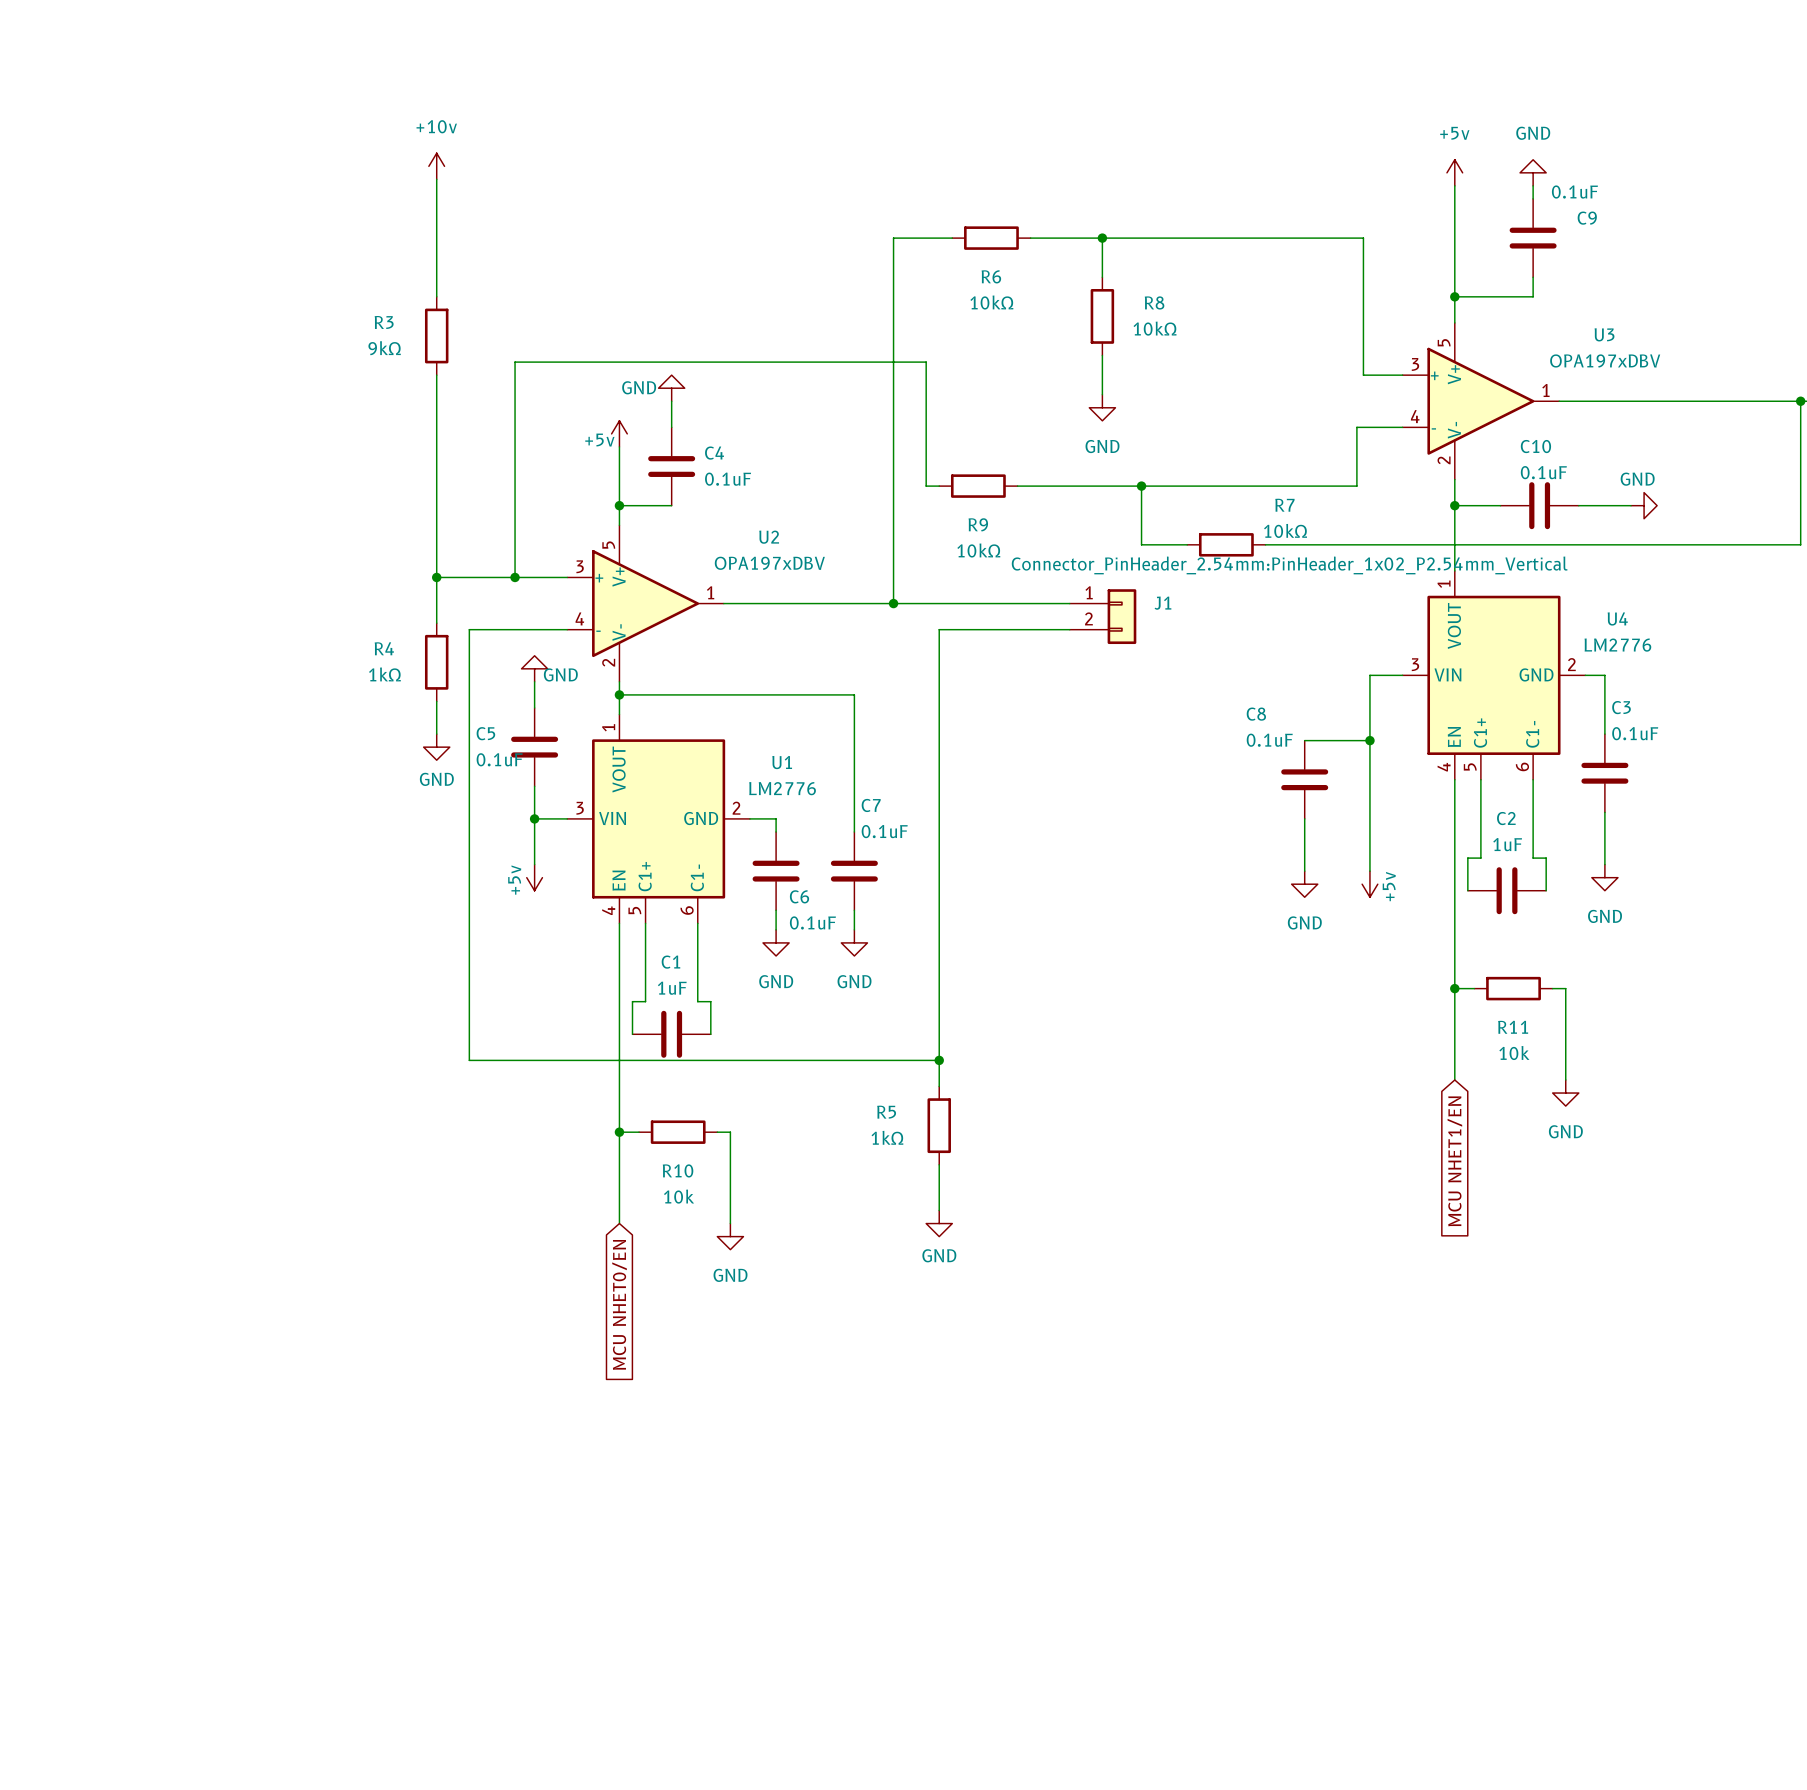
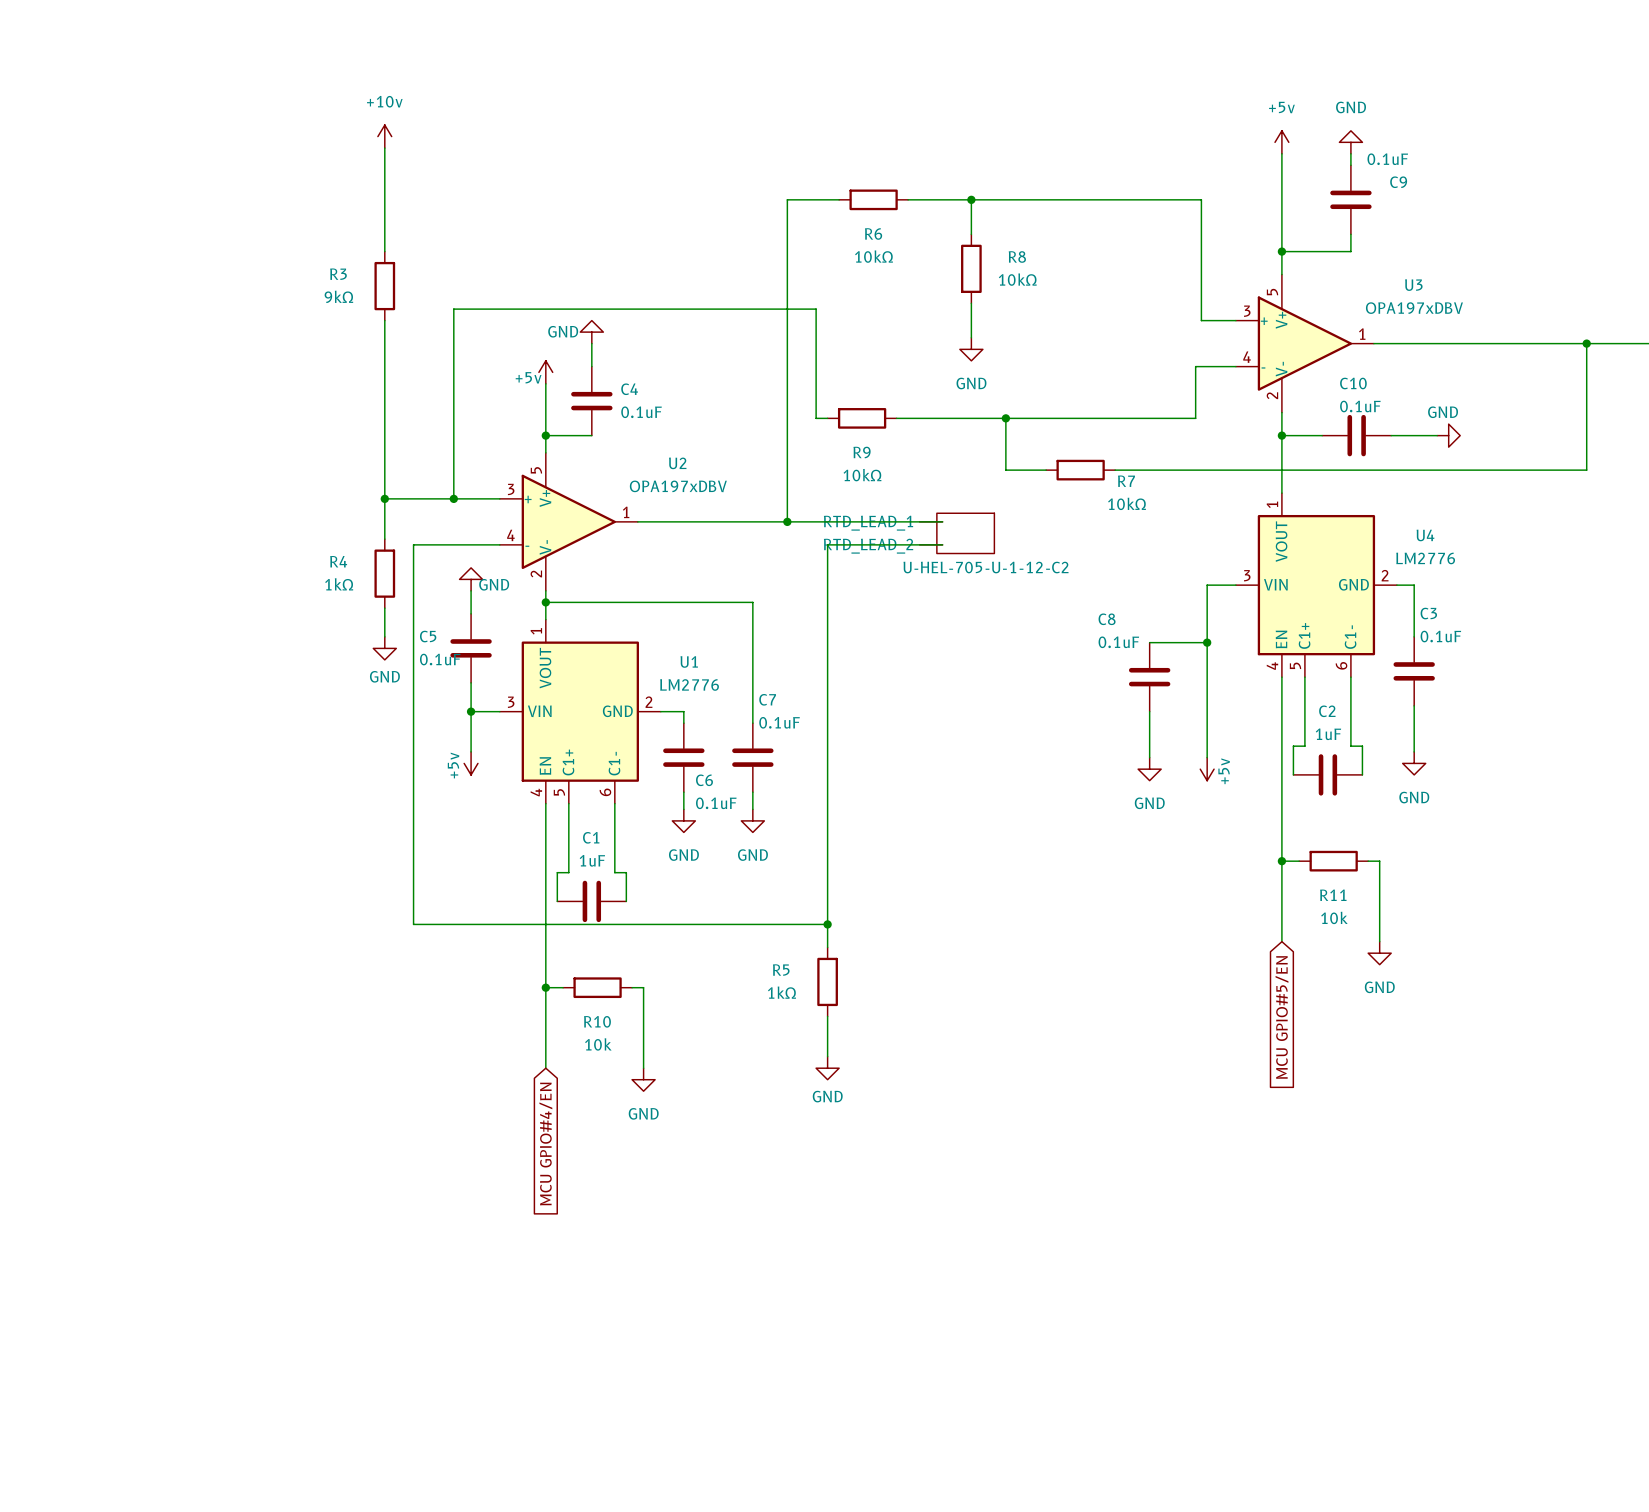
R7 name position: R7 (1284, 505) -> R7 (1126, 481)
R7 value position: 10kΩ (1285, 530) -> 10kΩ (1127, 503)
U-HEL-705-U-1-12-C2: none -> (957, 533)
J1: Connector_PinHeader_2.54mm:PinHeader_1x02_P2.54mm_Vertical (1103, 616) -> none
global label: MCU NHET1/EN (1454, 1161) -> MCU GPIO#5/EN (1281, 1017)
global label: MCU NHET0/EN (619, 1304) -> MCU GPIO#4/EN (545, 1144)

